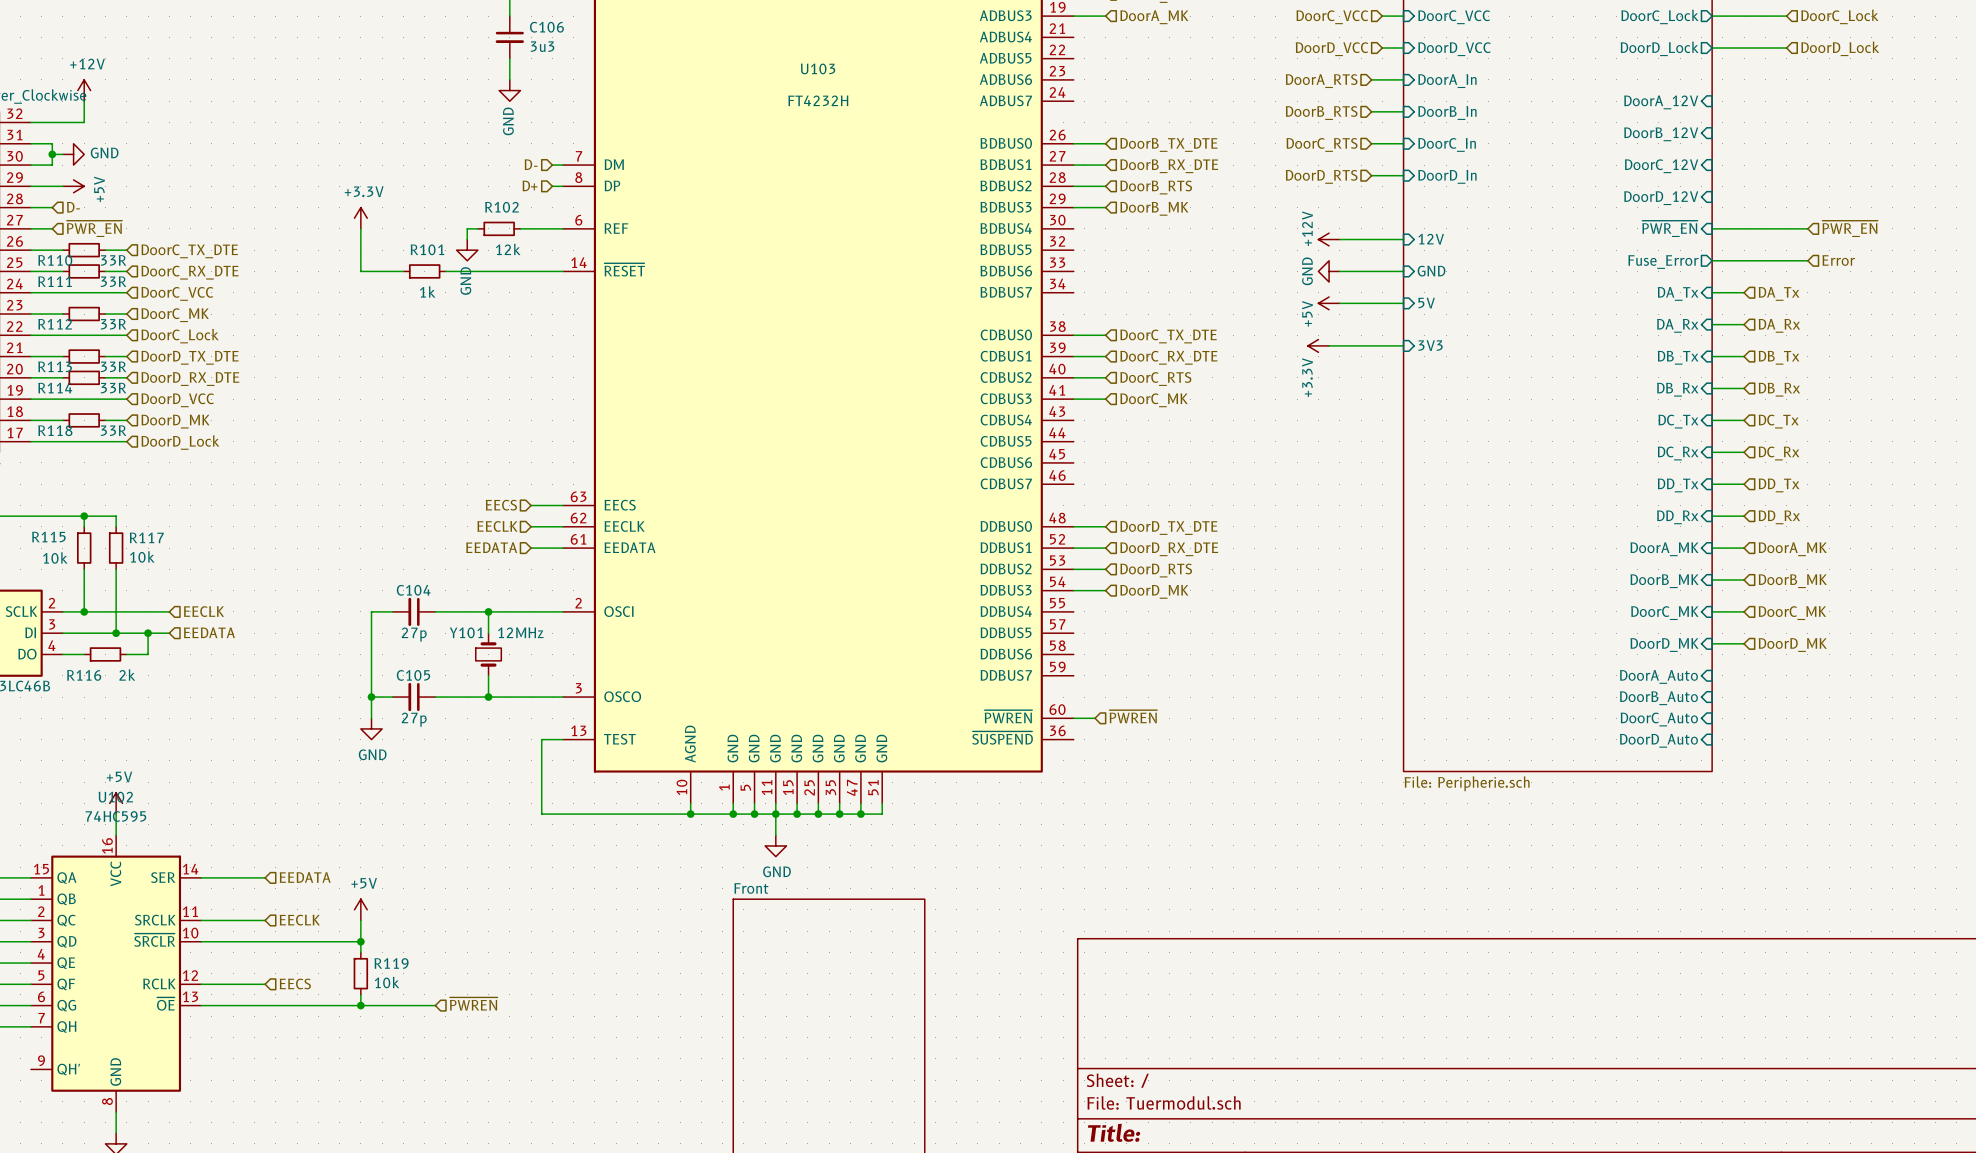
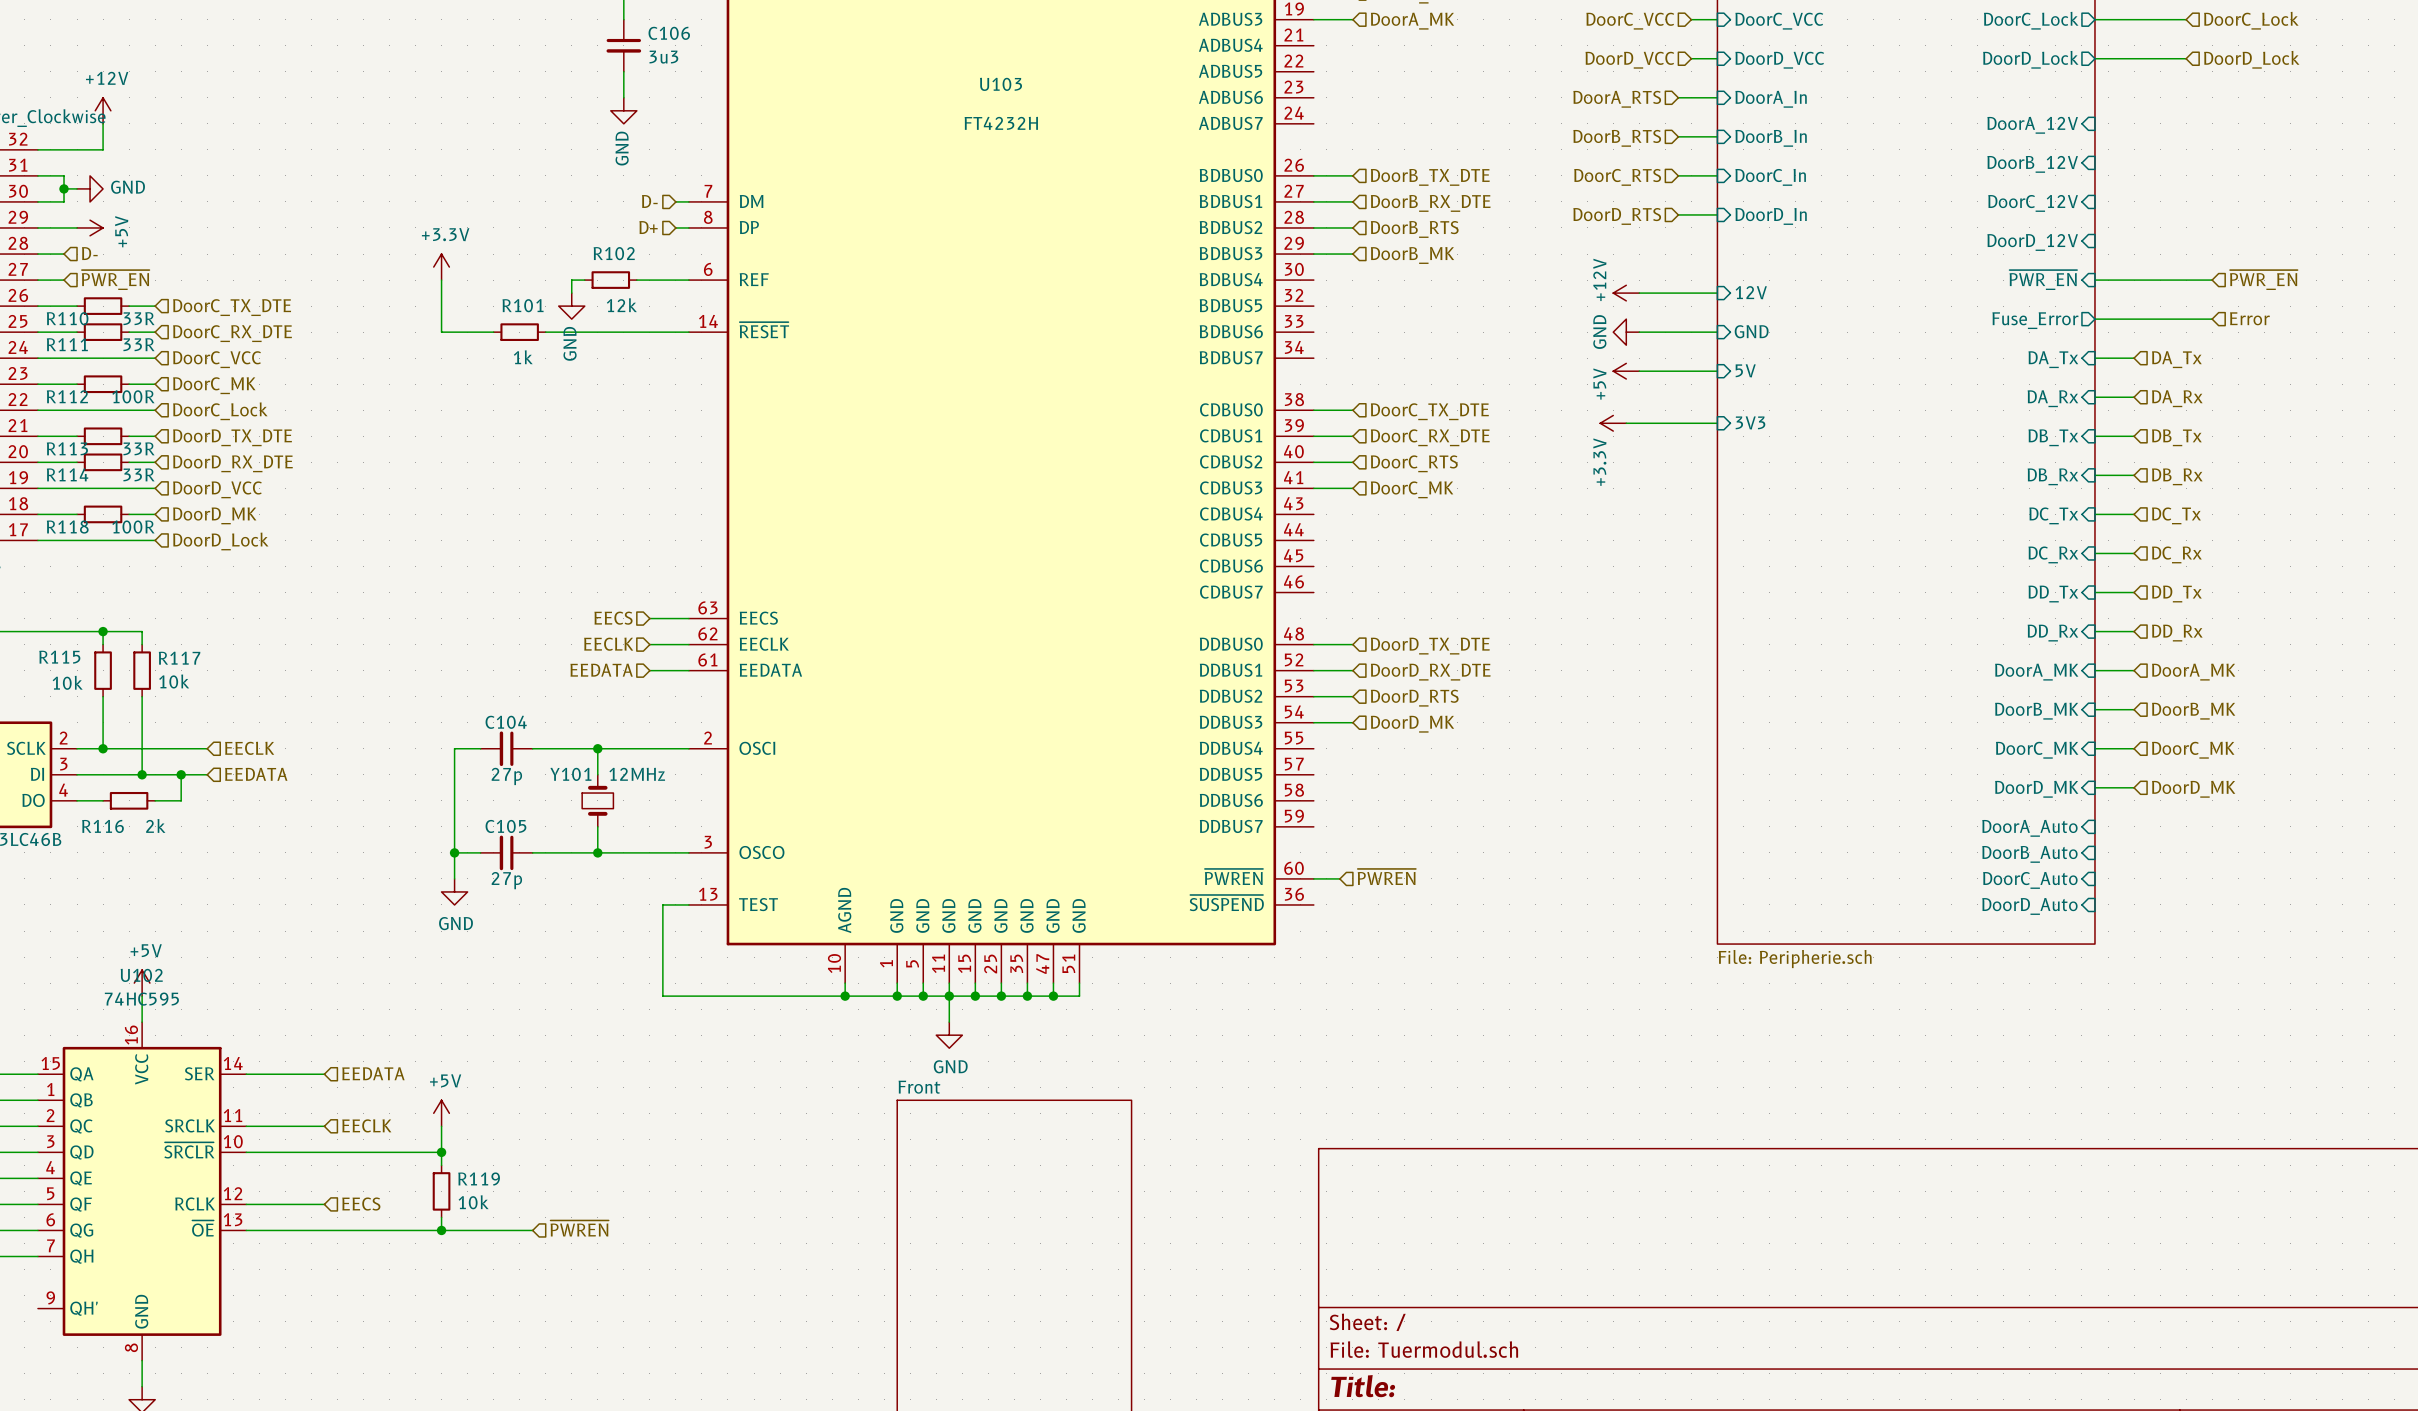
R112 value: 33R (113, 324) -> 100R (133, 396)
R118 value: 33R (113, 430) -> 100R (133, 527)

